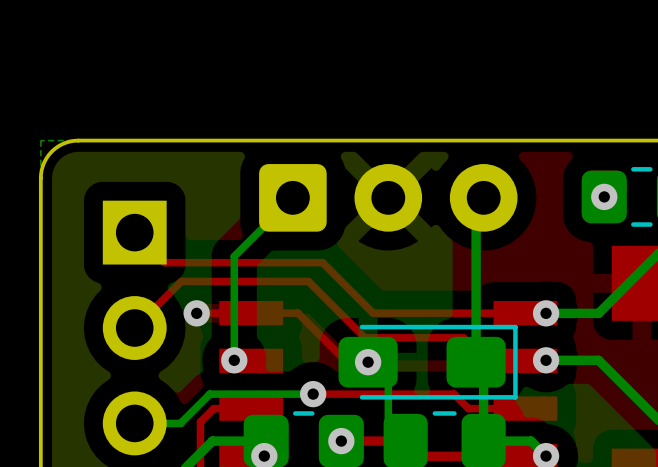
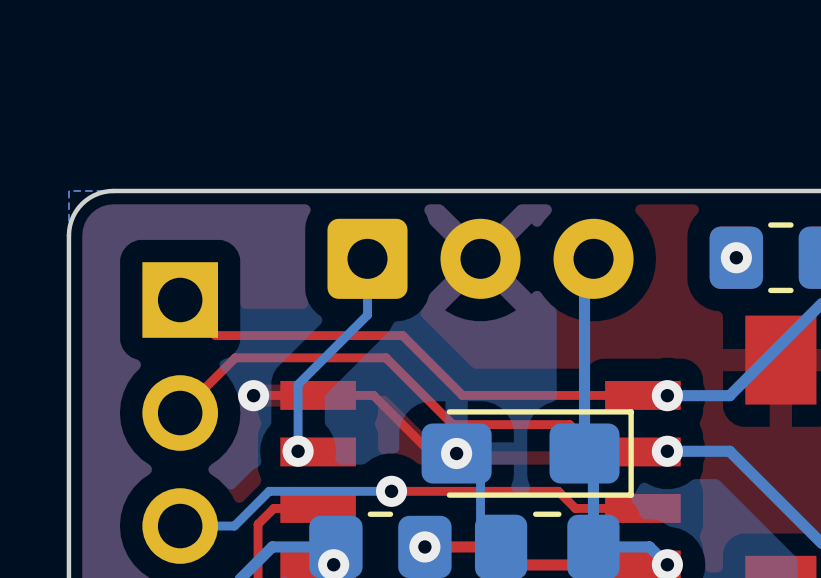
bottom track: (292, 197) (234, 256) (234, 303) -> (367, 258) (367, 315) (298, 384)

